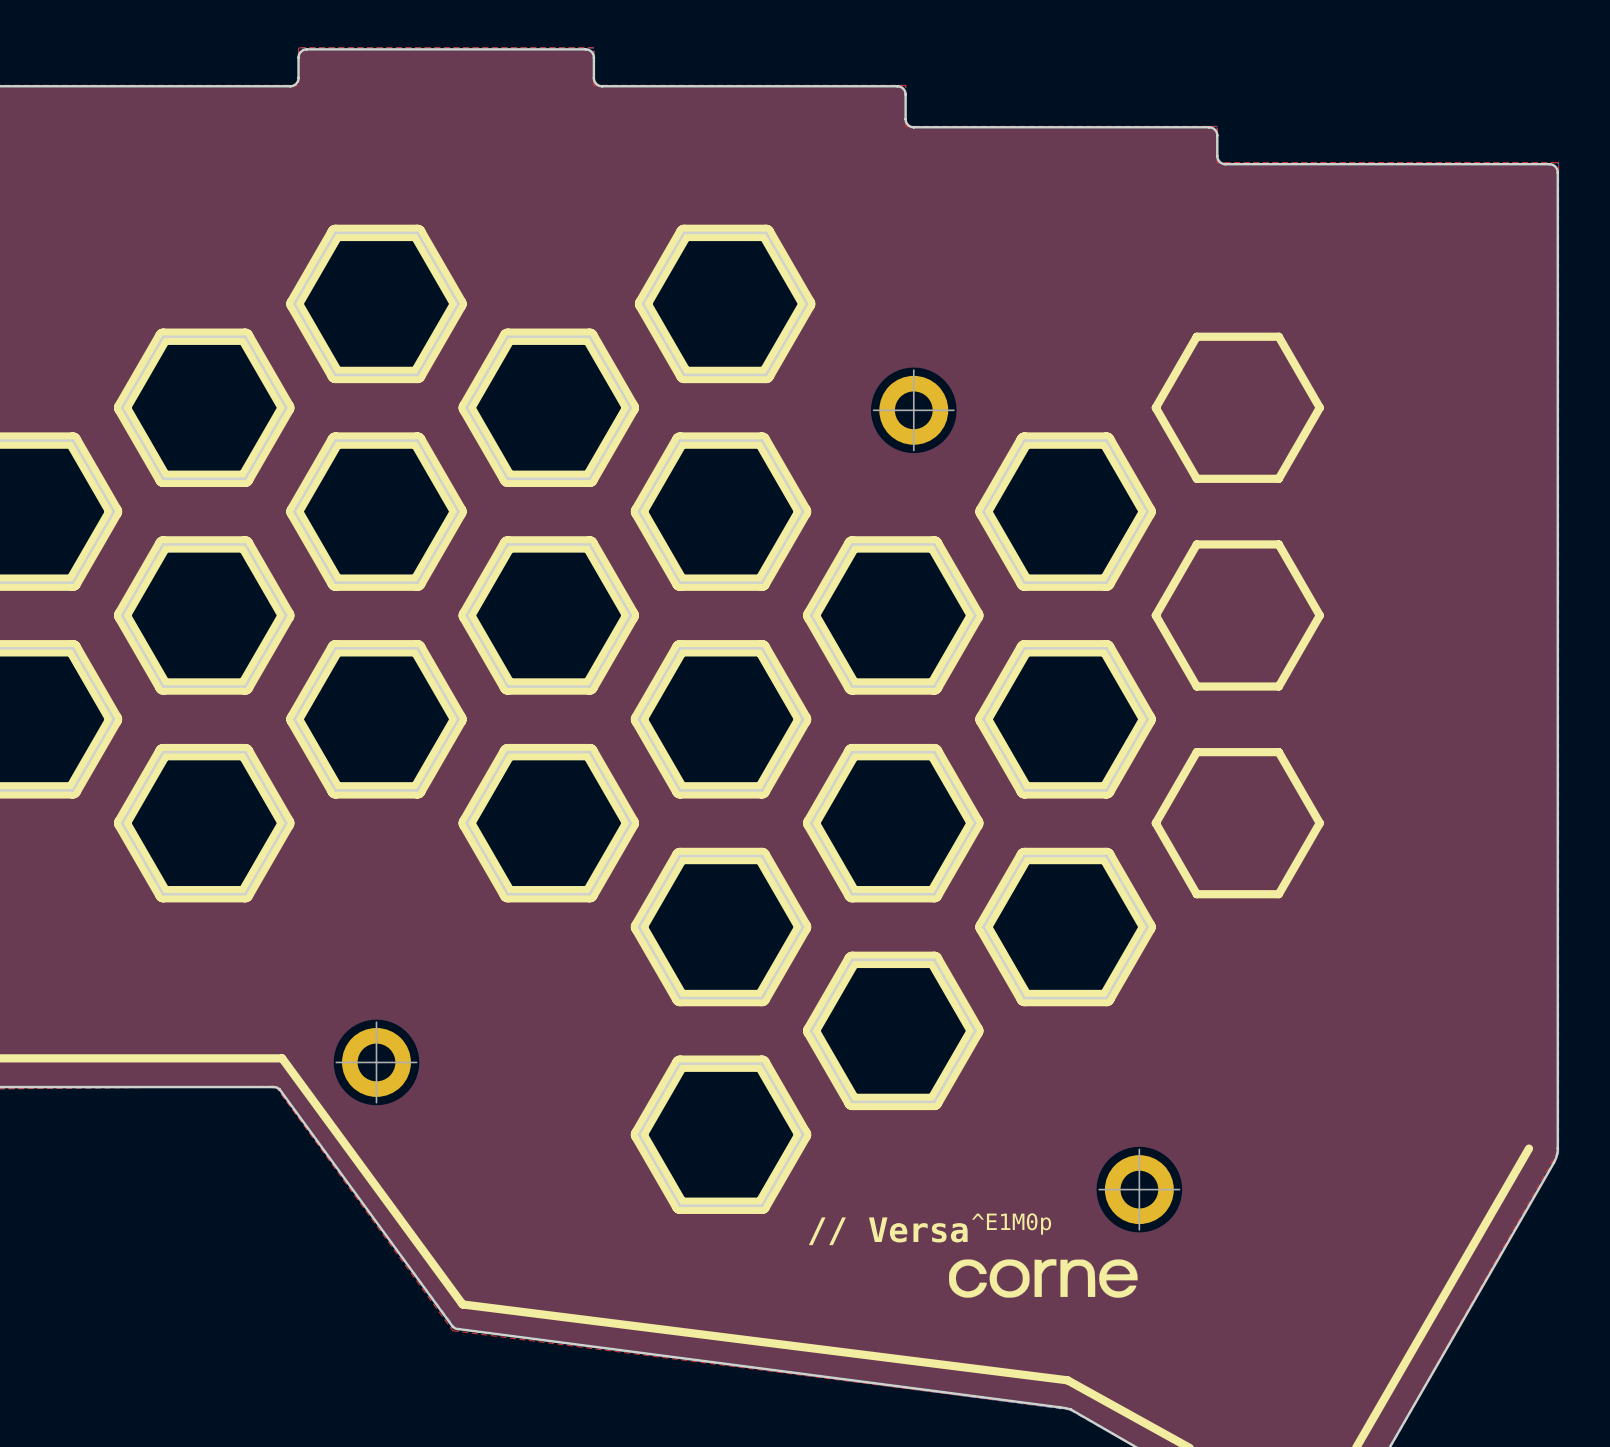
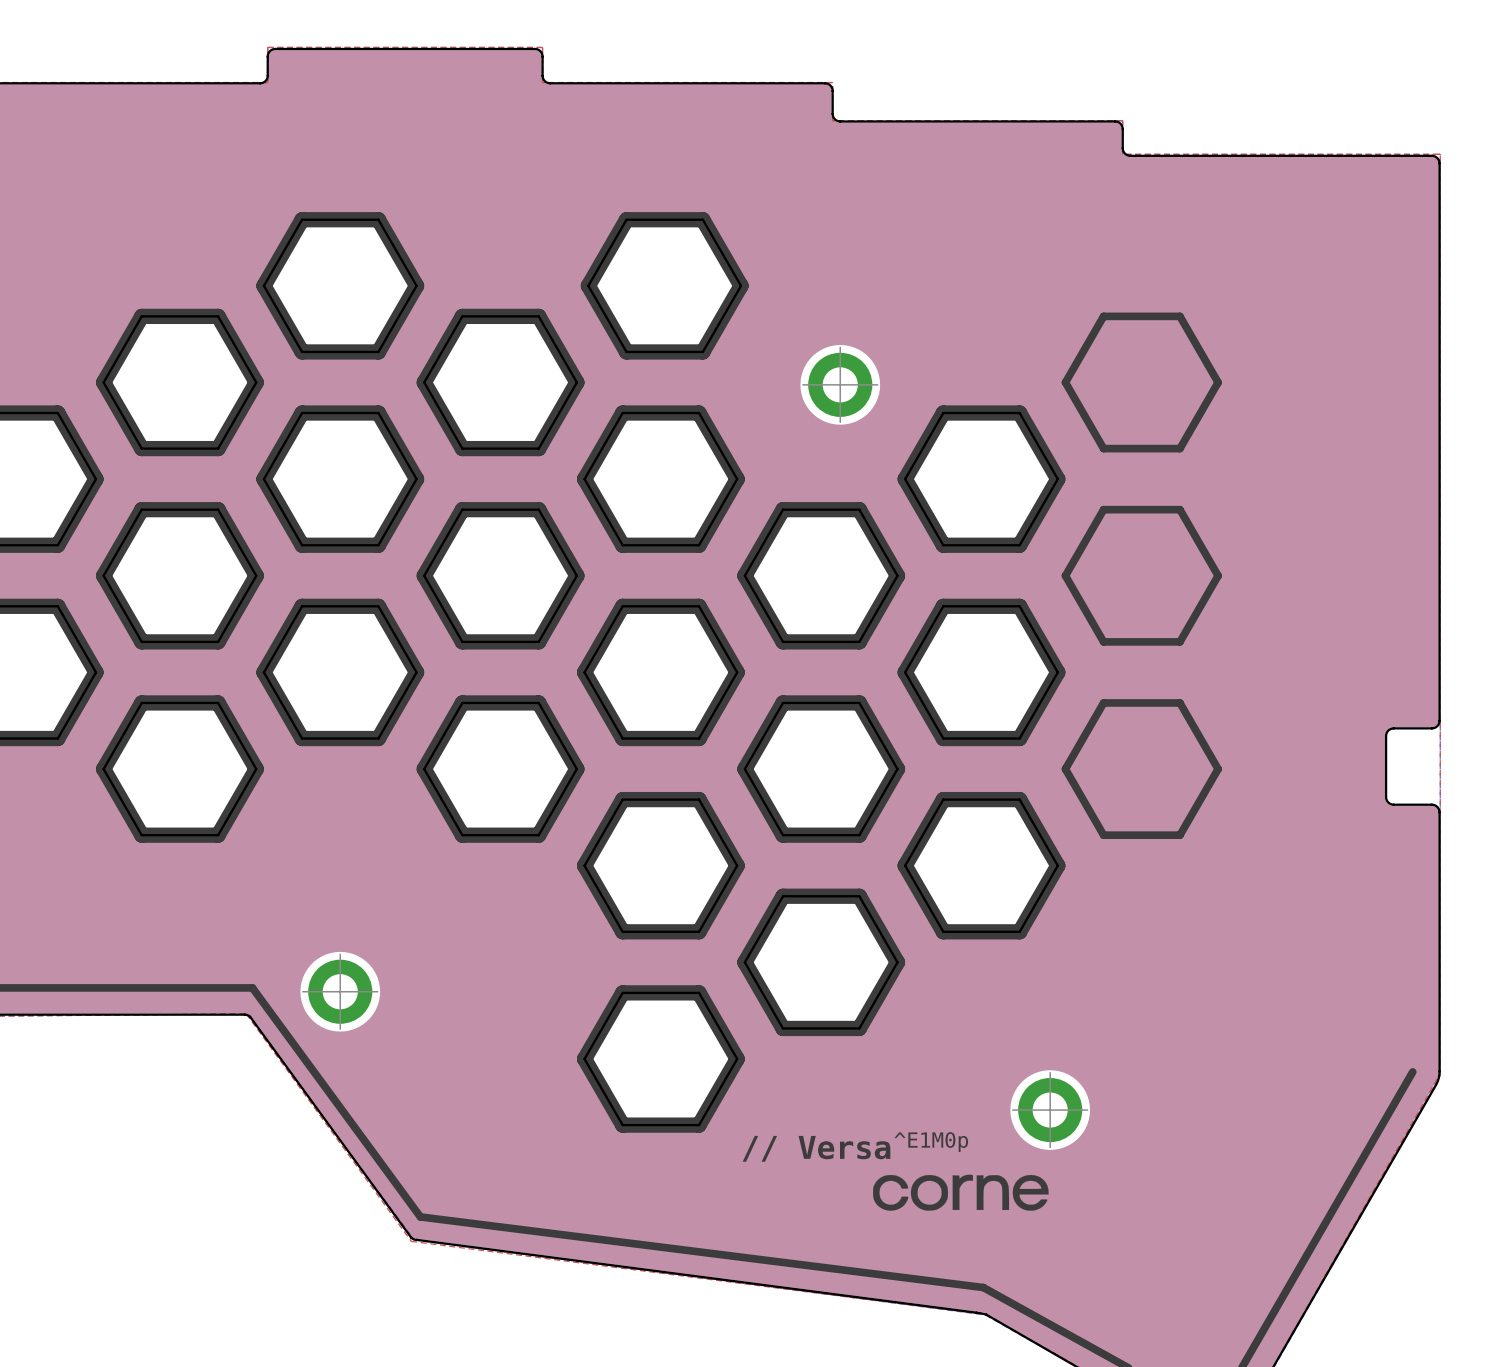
board edge: (1557, 771) (1557, 869) -> (1439, 720) (1437, 725) (1432, 728) (1391, 728) (1387, 731) (1386, 736) (1387, 801) (1392, 804) (1433, 804) (1437, 807) (1439, 812)

